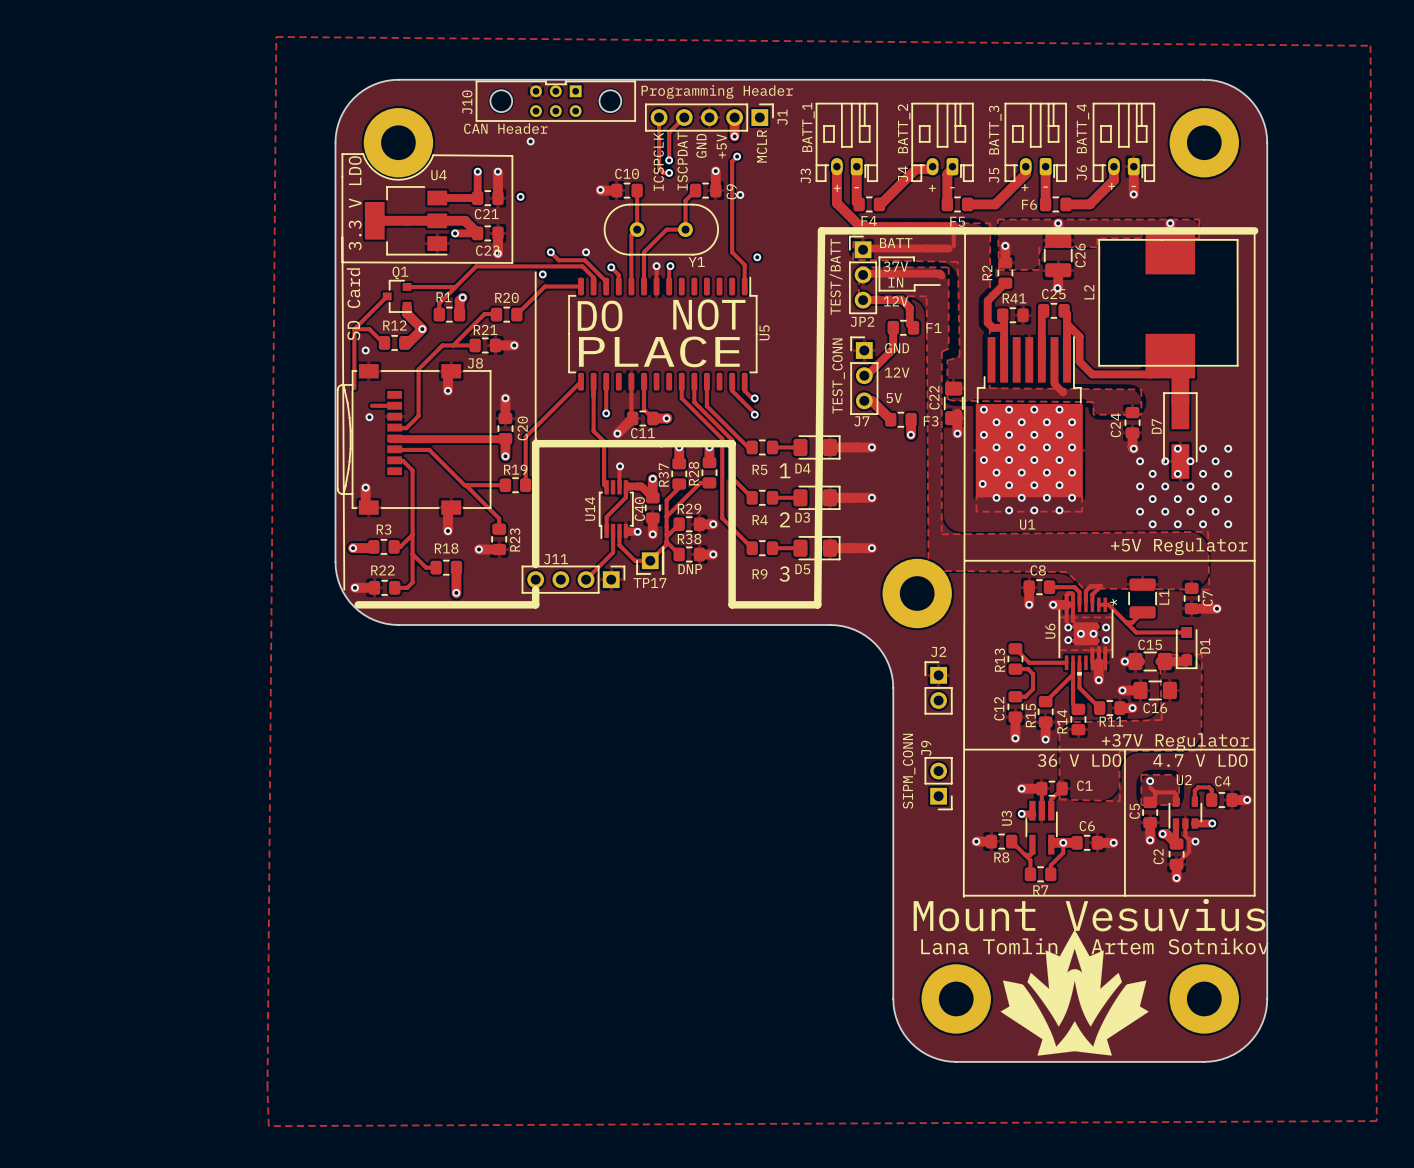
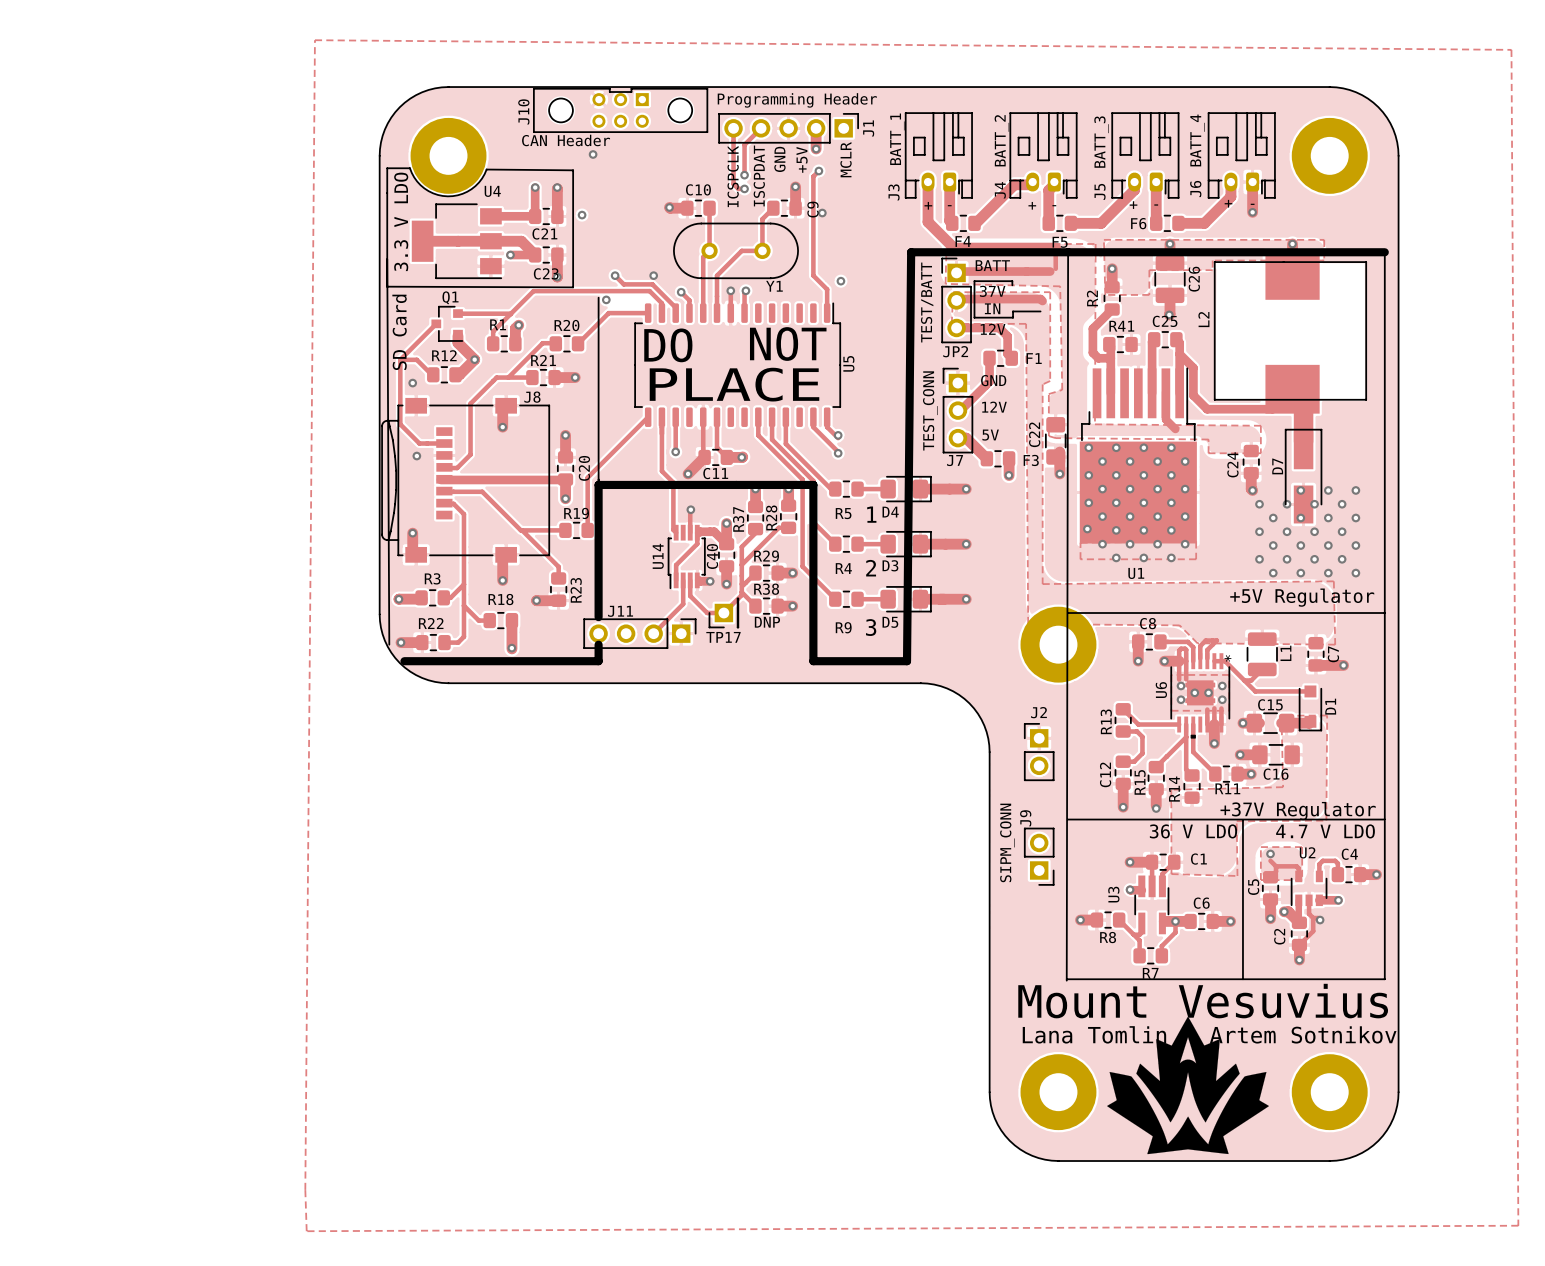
track: none -> (400, 424) (419, 443)
part position: (917, 593) -> (1058, 644)

